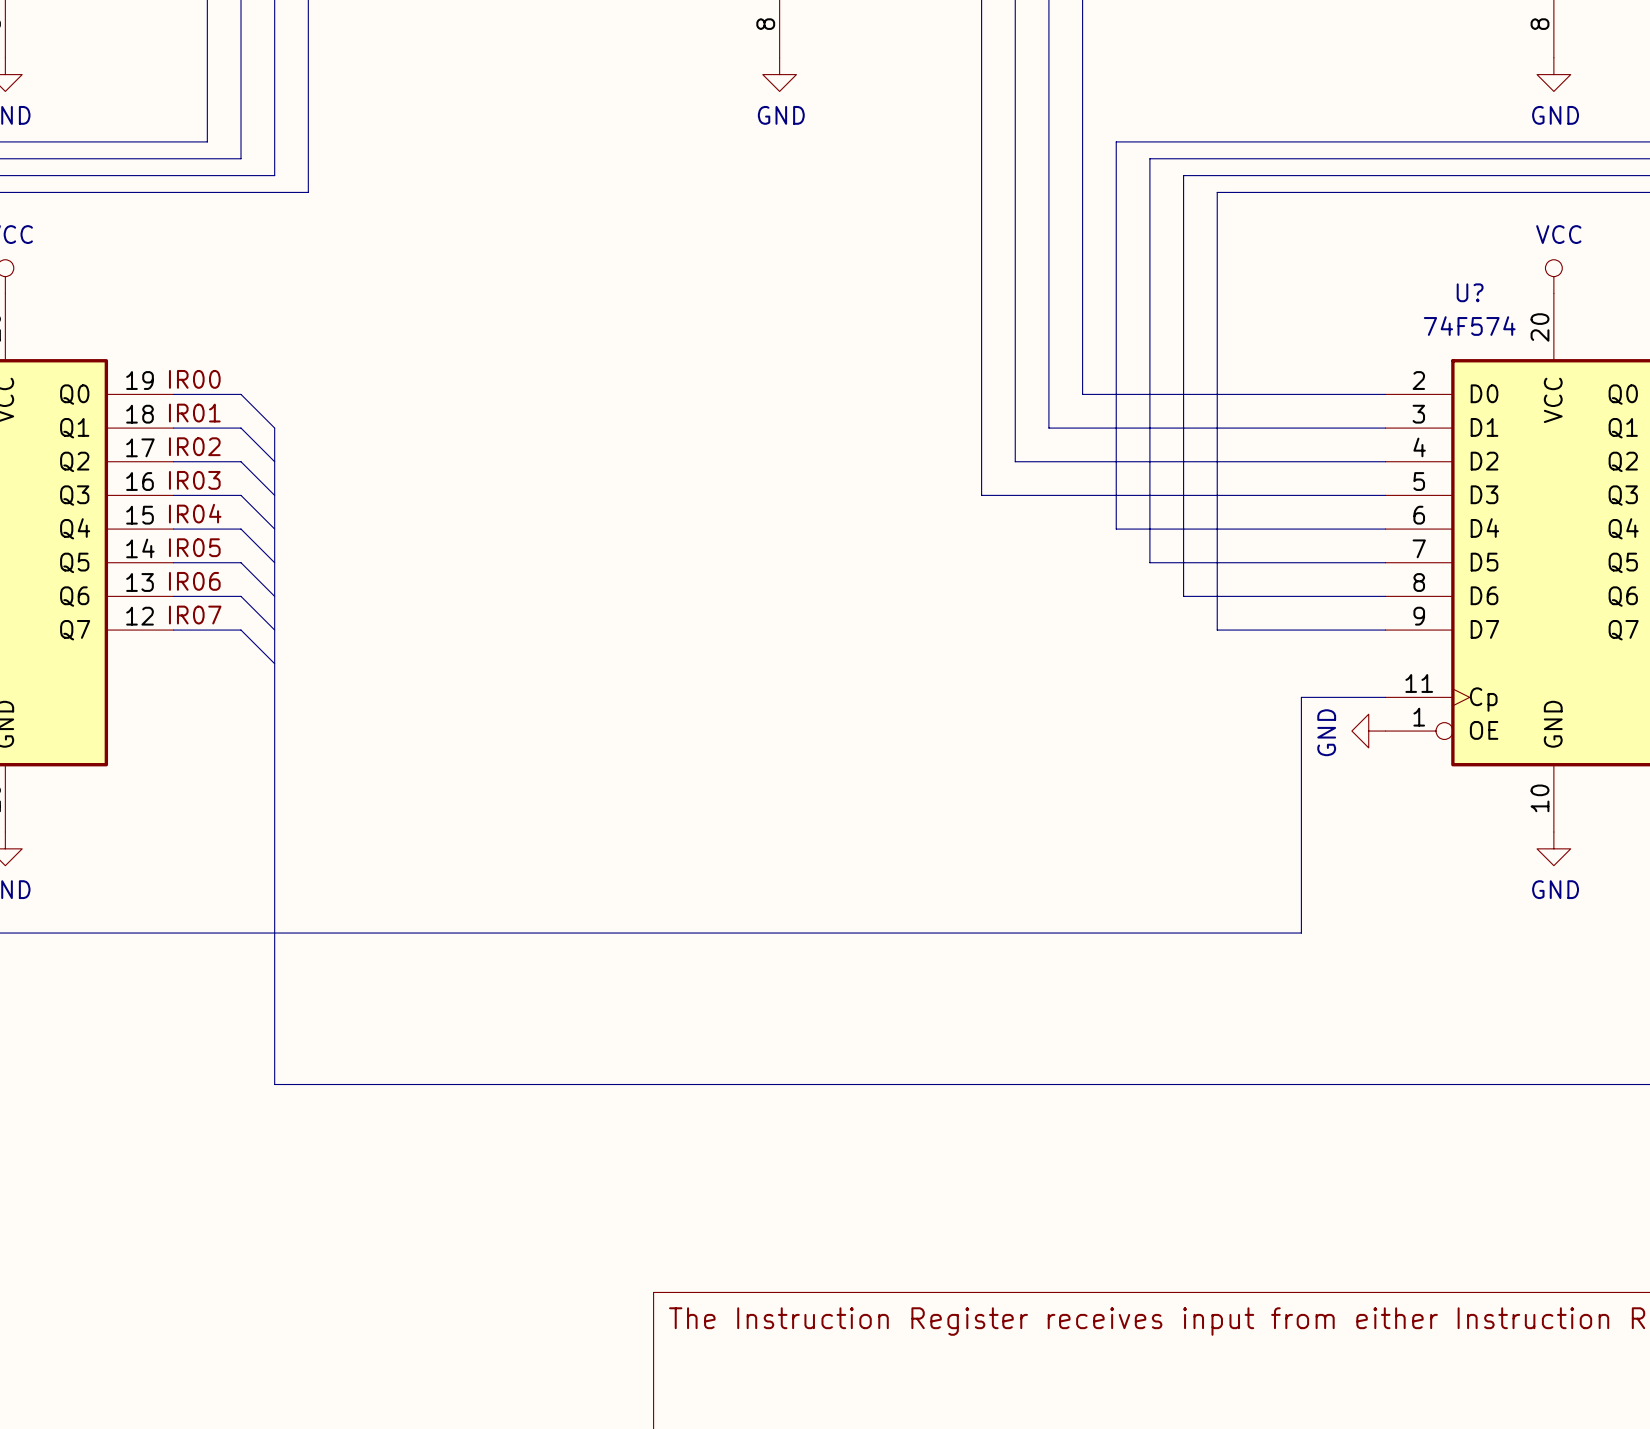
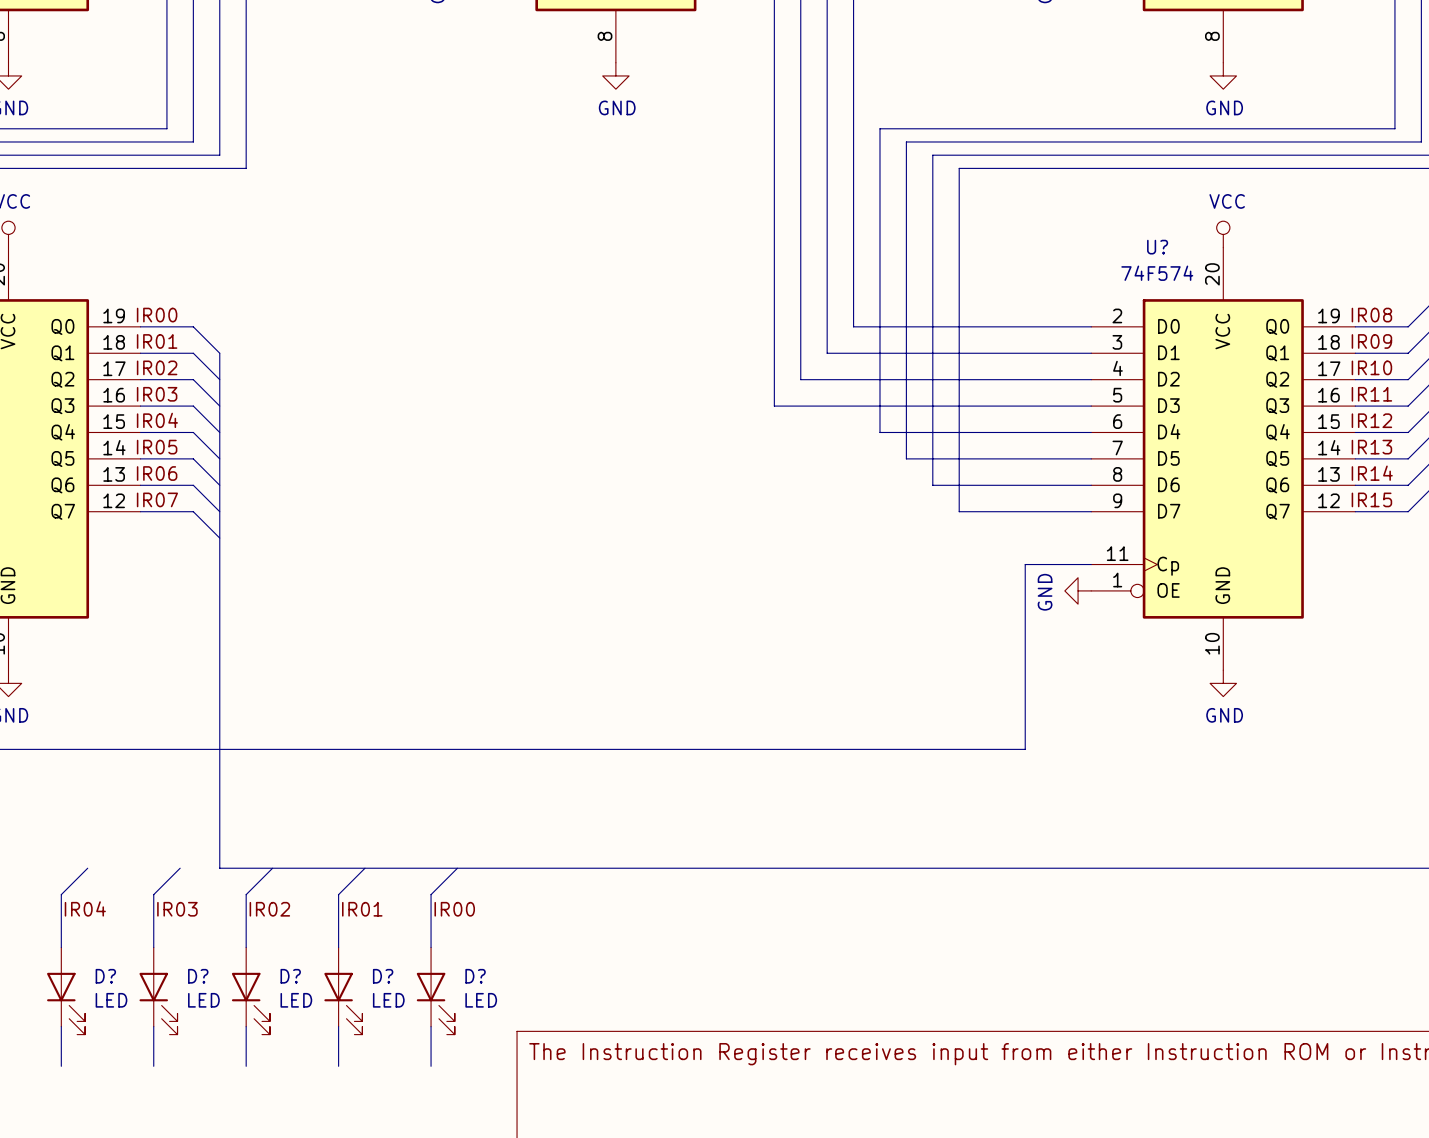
wire: none -> (87, 868) (61, 894) (61, 947)
wire: none -> (180, 868) (153, 894) (153, 947)
wire: none -> (272, 868) (246, 894) (246, 947)
wire: none -> (365, 868) (338, 894) (338, 947)
wire: none -> (457, 868) (431, 894) (431, 947)
label: none -> IR04 (85, 908)
label: none -> IR03 (177, 909)
label: none -> IR02 (269, 909)
label: none -> IR01 (362, 909)
label: none -> IR00 (454, 909)
D?: none -> LED (66, 991)
D?: none -> LED (158, 991)
D?: none -> LED (250, 991)
D?: none -> LED (343, 991)
D?: none -> LED (435, 991)
wire: none -> (61, 1026) (61, 1066)
wire: none -> (153, 1026) (153, 1066)
wire: none -> (246, 1026) (246, 1066)
wire: none -> (338, 1026) (338, 1066)
wire: none -> (431, 1026) (431, 1066)

